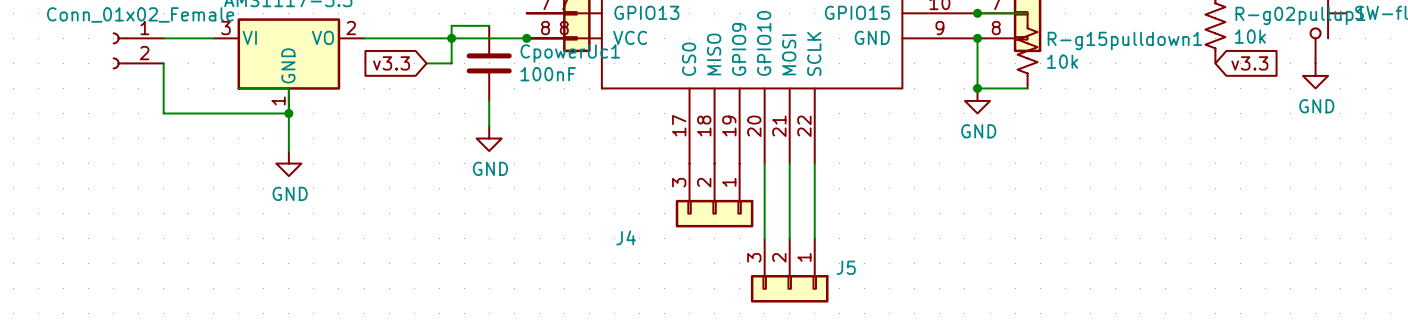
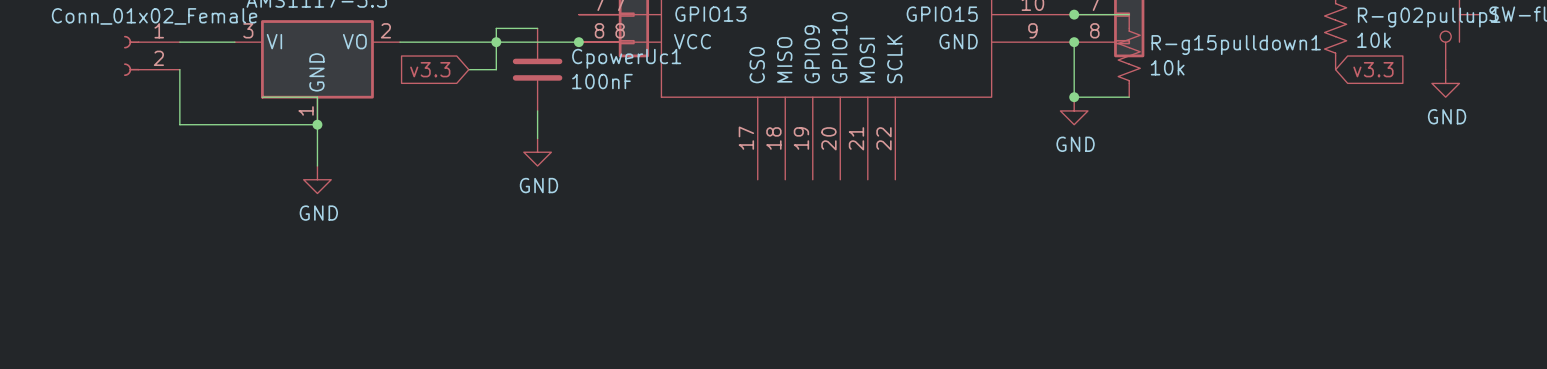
wire: (764, 163) (764, 238) -> none
wire: (789, 163) (789, 238) -> none
wire: (814, 163) (814, 238) -> none
J4: (714, 195) -> none
J5: (789, 270) -> none

